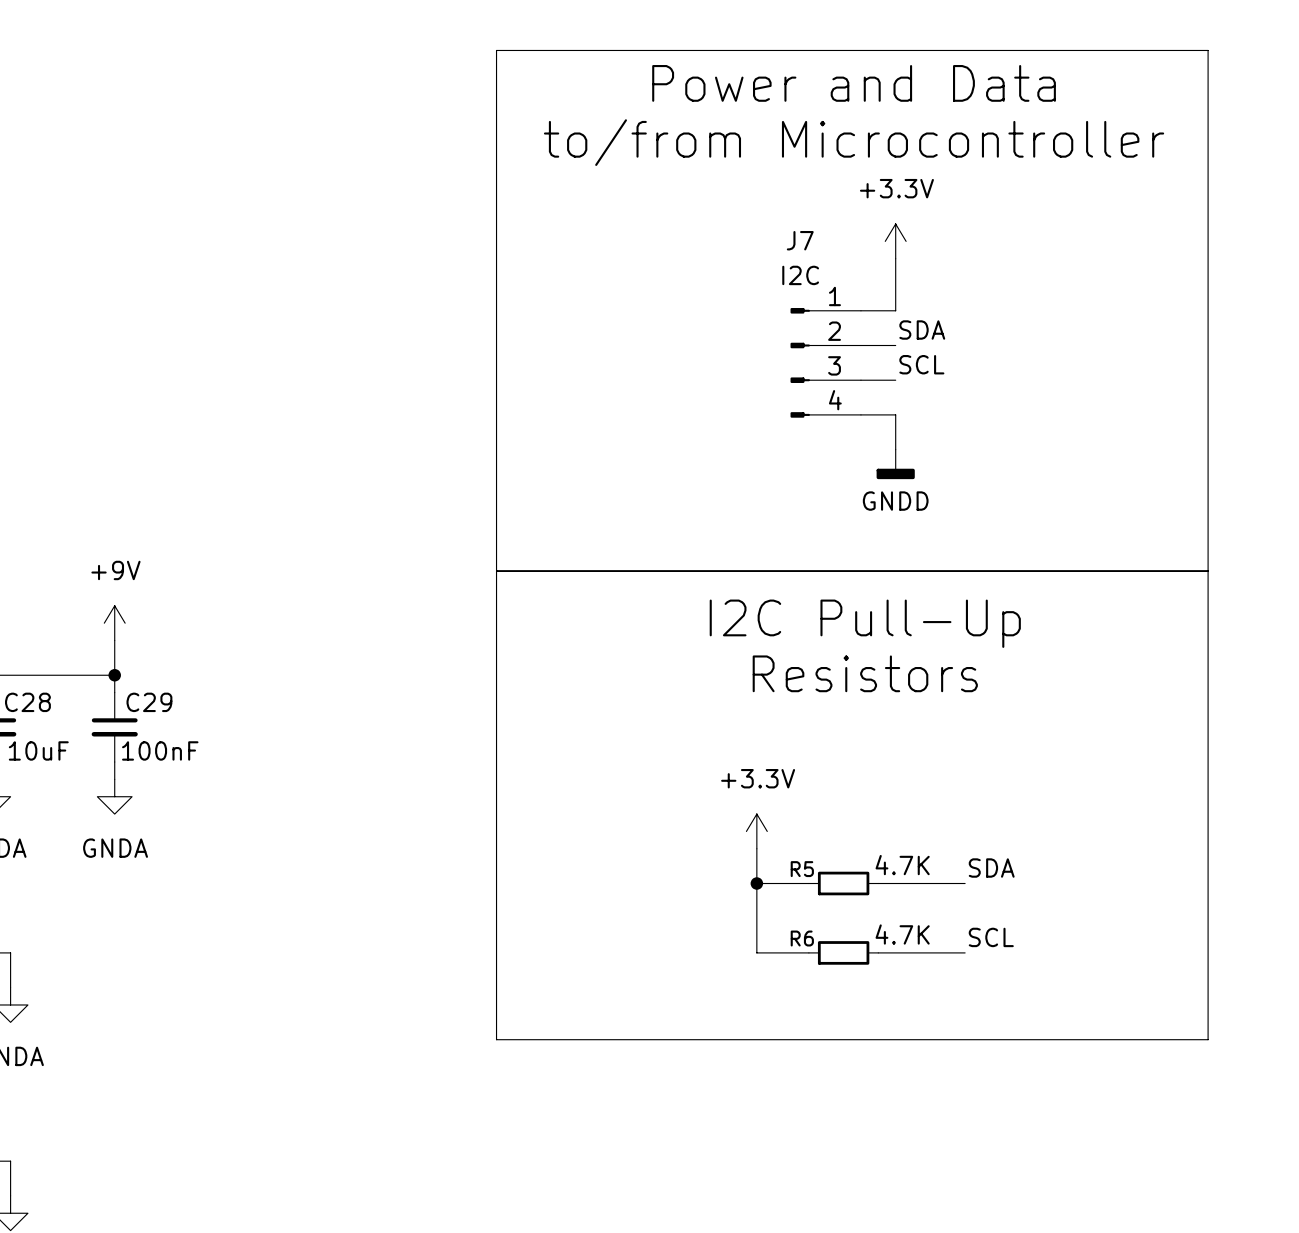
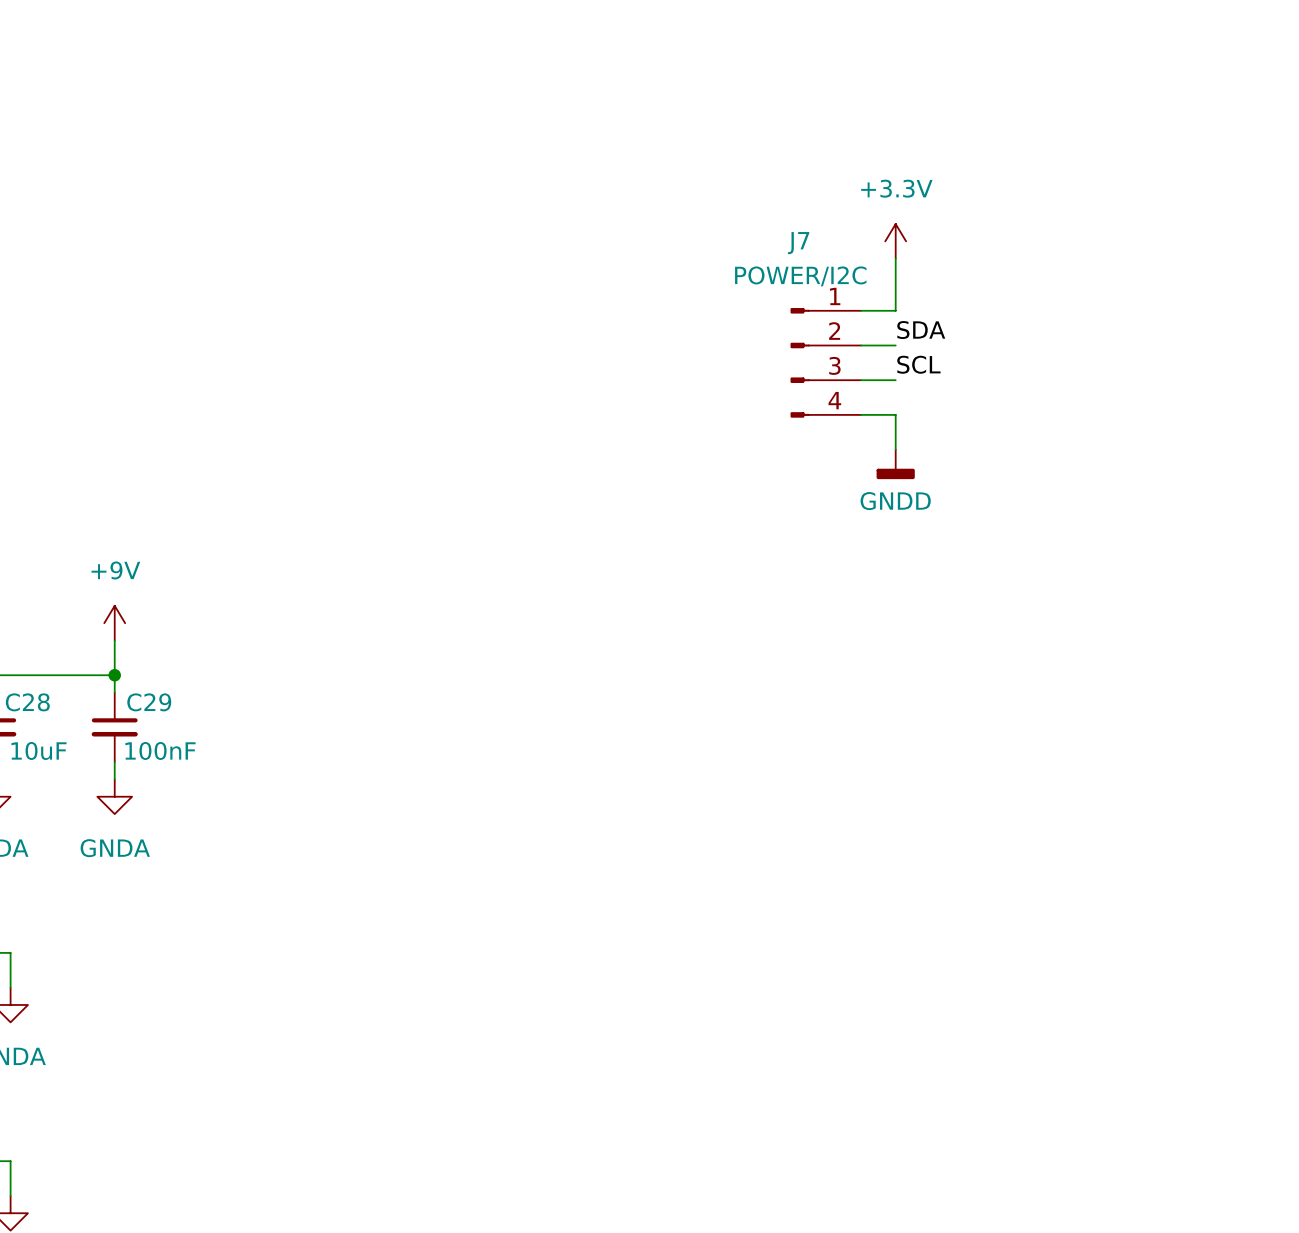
line: (496, 50) (1208, 50) (1208, 1039) (496, 1039) (496, 50) -> none
text: Power and Data (854, 83) -> none
text: to/from Microcontroller (854, 142) -> none
J7 value: I2C (800, 275) -> POWER/I2C (800, 276)
line: (496, 571) (1208, 571) -> none
text: I2C Pull-Up (865, 623) -> none
text: Resistors (865, 673) -> none
power symbol: +3.3V (756, 831) -> none
wire: (756, 848) (756, 952) (808, 952) -> none
label: SDA (991, 868) -> none
wire: (756, 883) (808, 883) -> none
junction: (756, 883) -> none
R5: 4.7K (843, 883) -> none
wire: (878, 883) (965, 883) -> none
label: SCL (991, 937) -> none
R6: 4.7K (843, 952) -> none
wire: (878, 952) (965, 952) -> none

